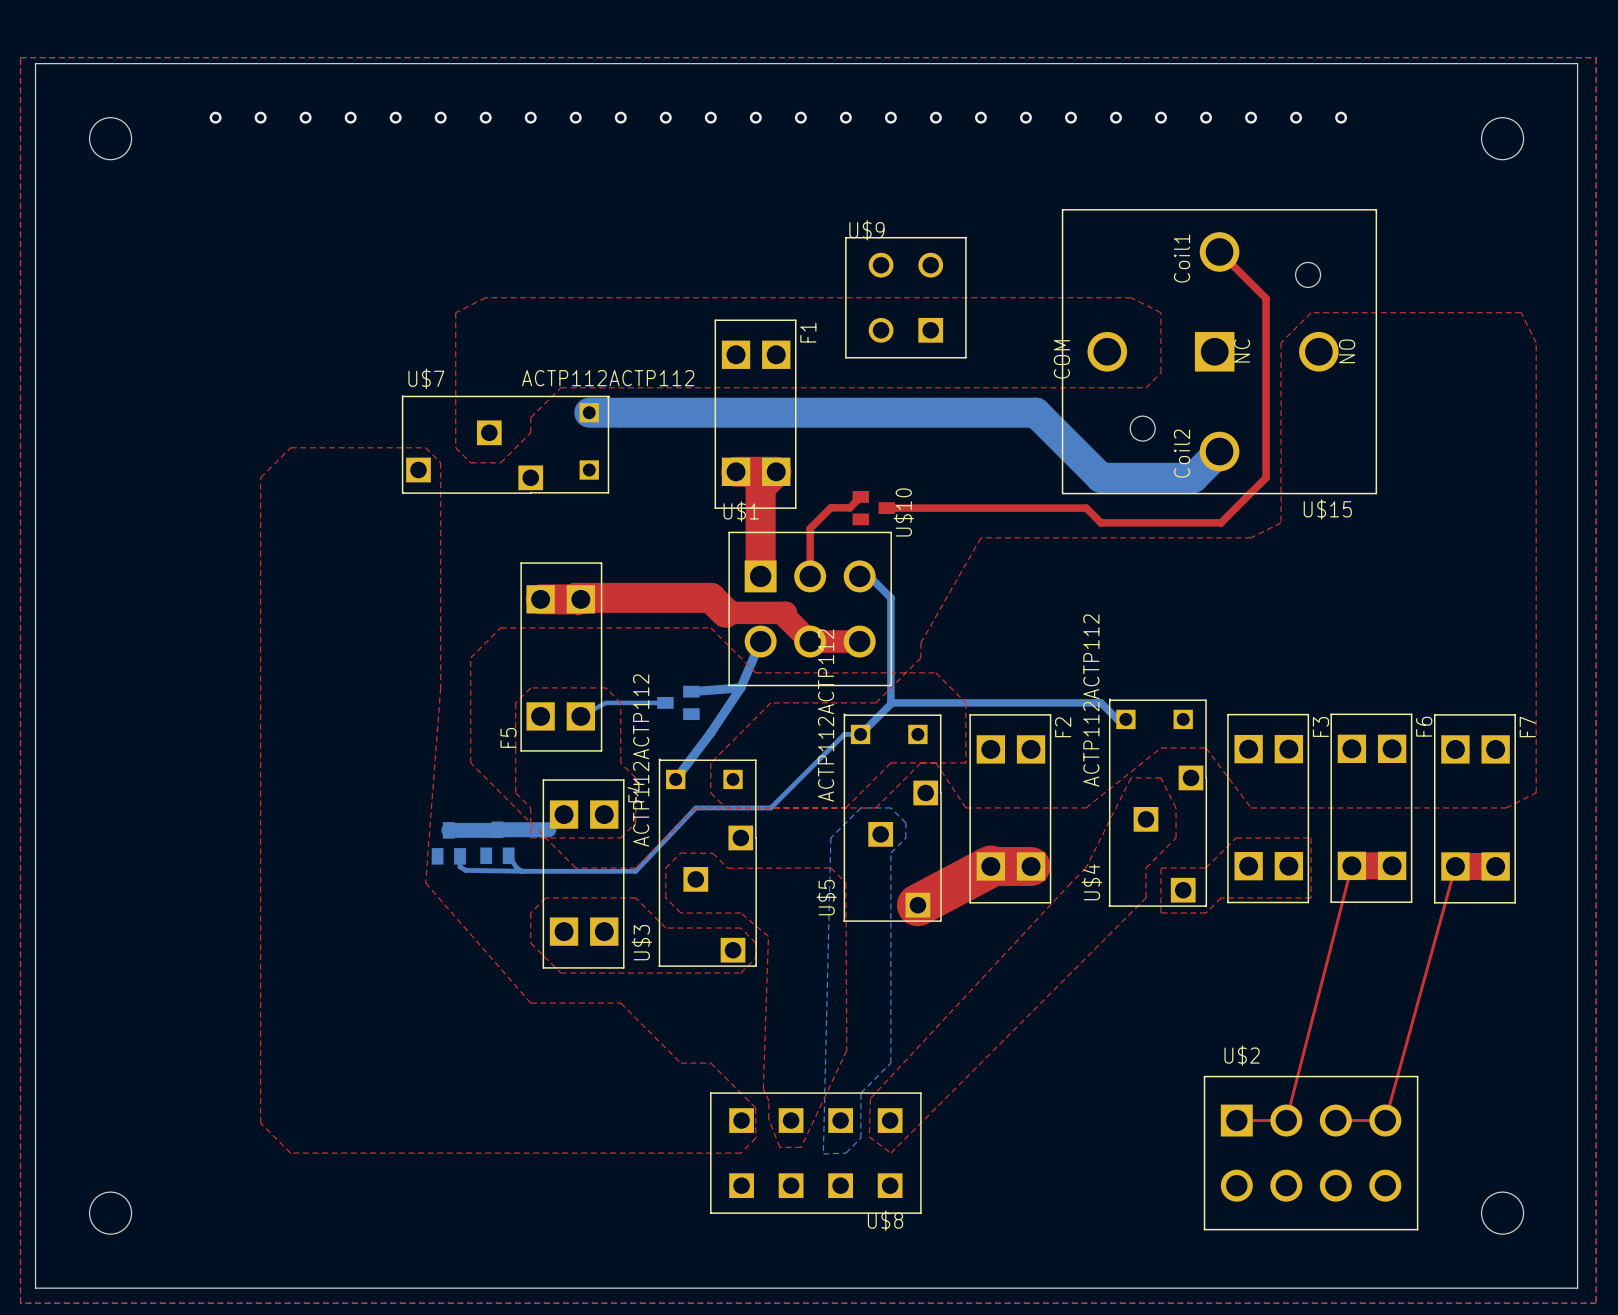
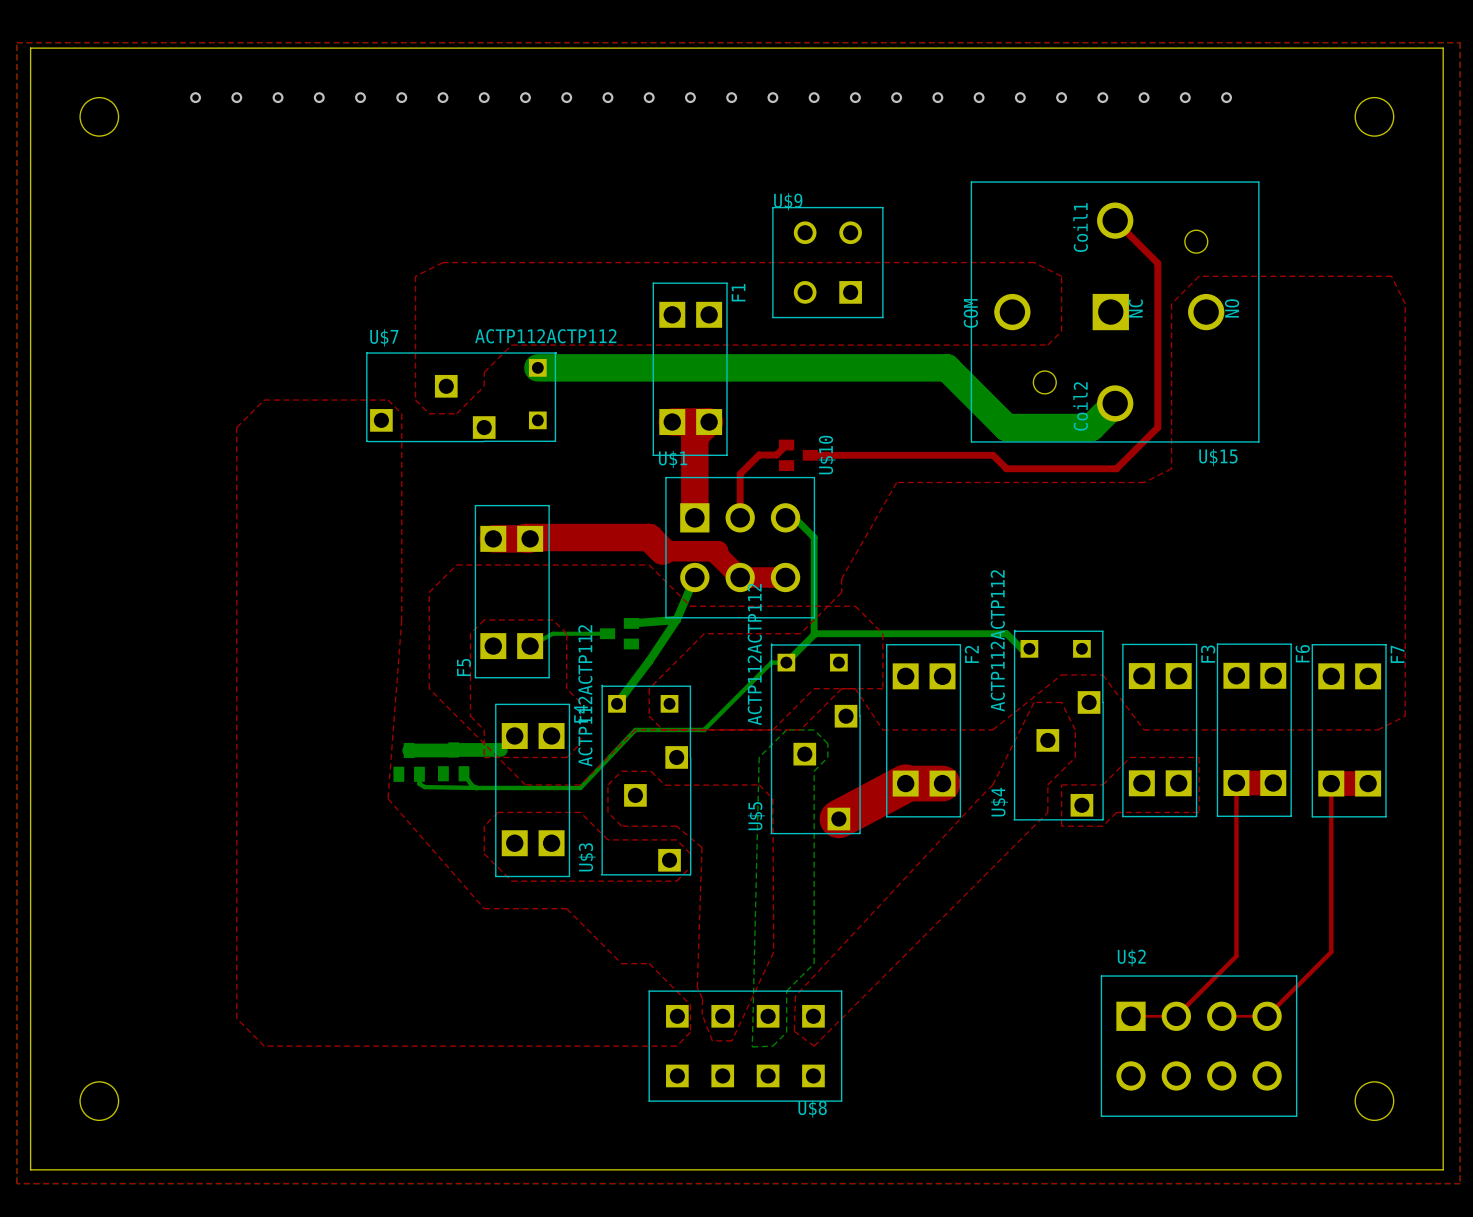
top track: (1351, 865) (1286, 1120) -> (1236, 783) (1236, 956) (1176, 1016)
top track: (1455, 866) (1385, 1120) -> (1331, 783) (1331, 952) (1267, 1016)

